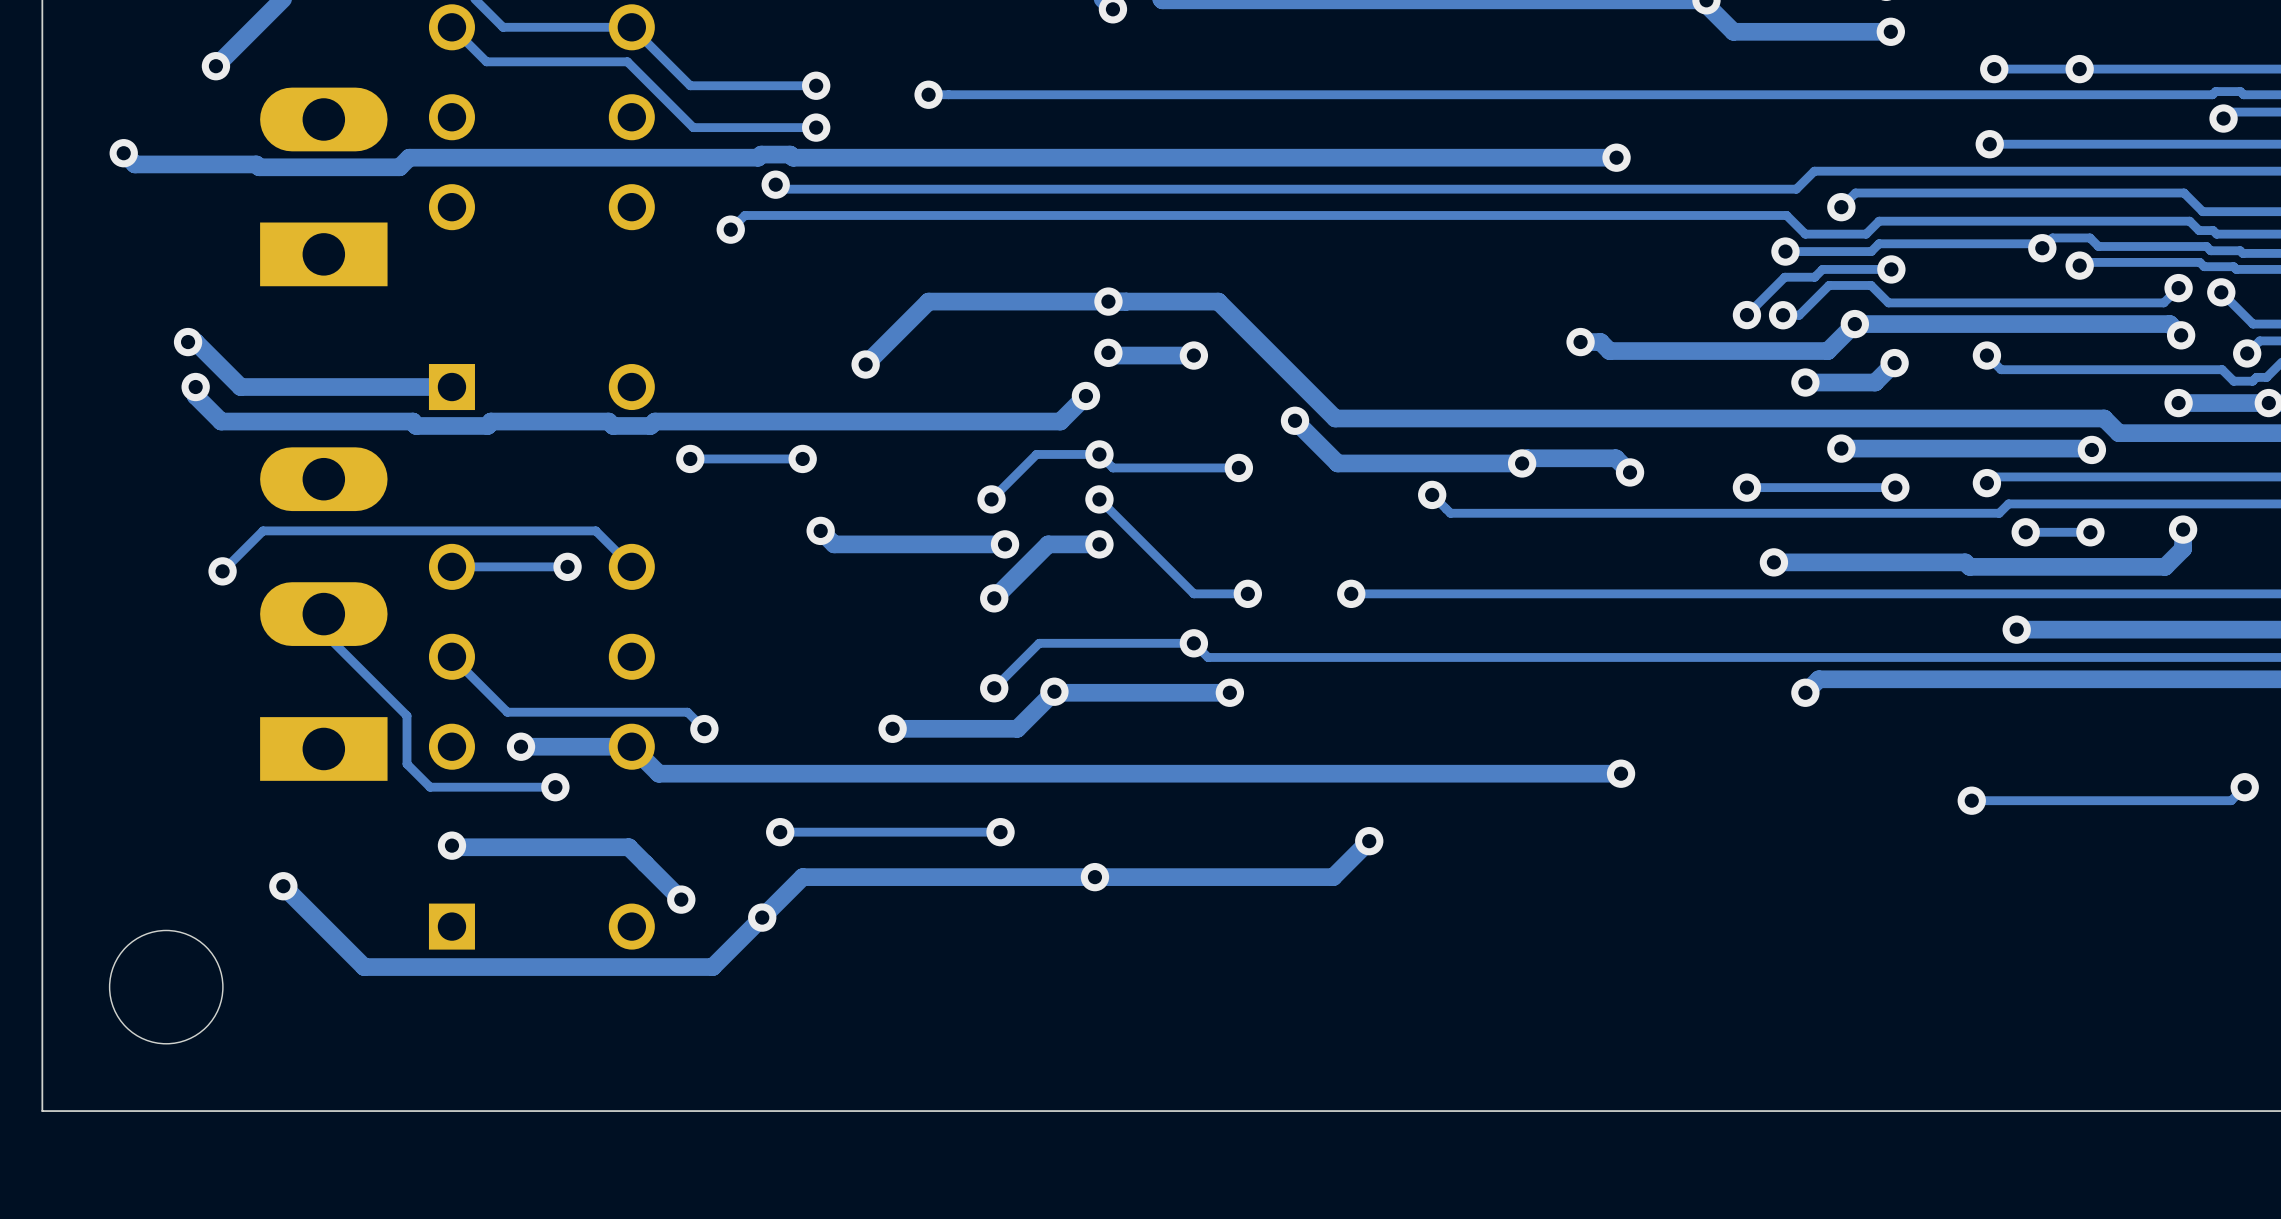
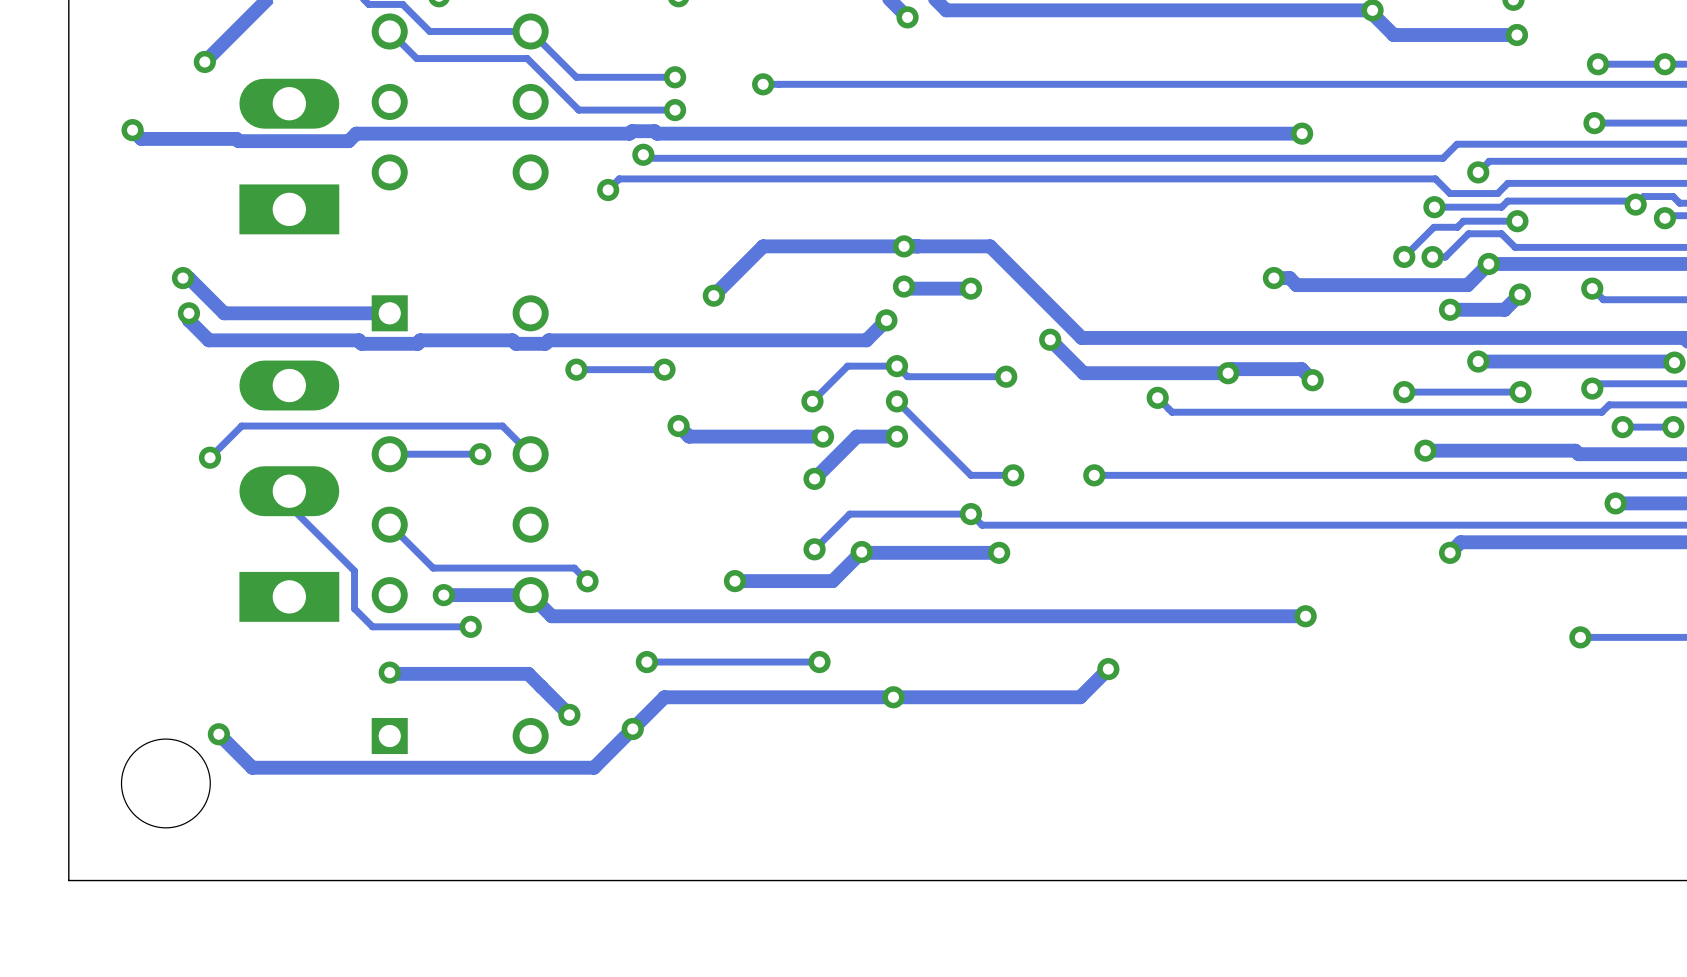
track: (283, 886) (364, 967) -> (218, 734) (252, 767) (320, 767)
via position: (283, 886) -> (218, 734)

